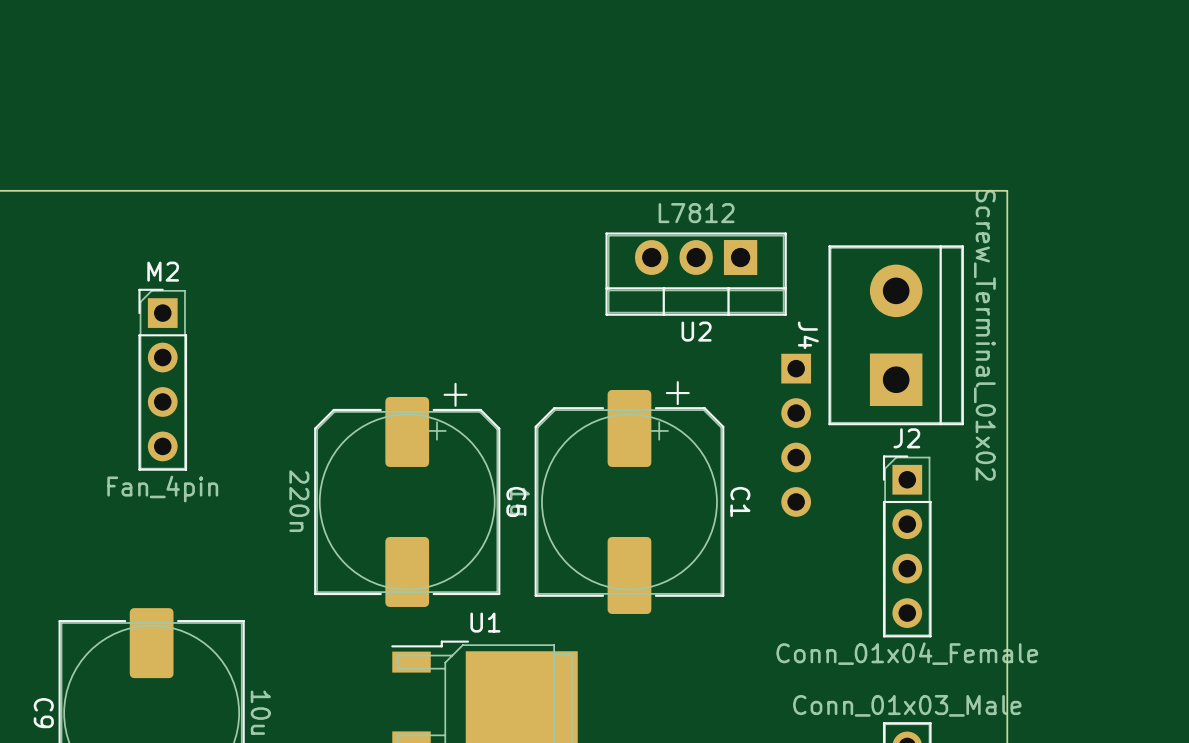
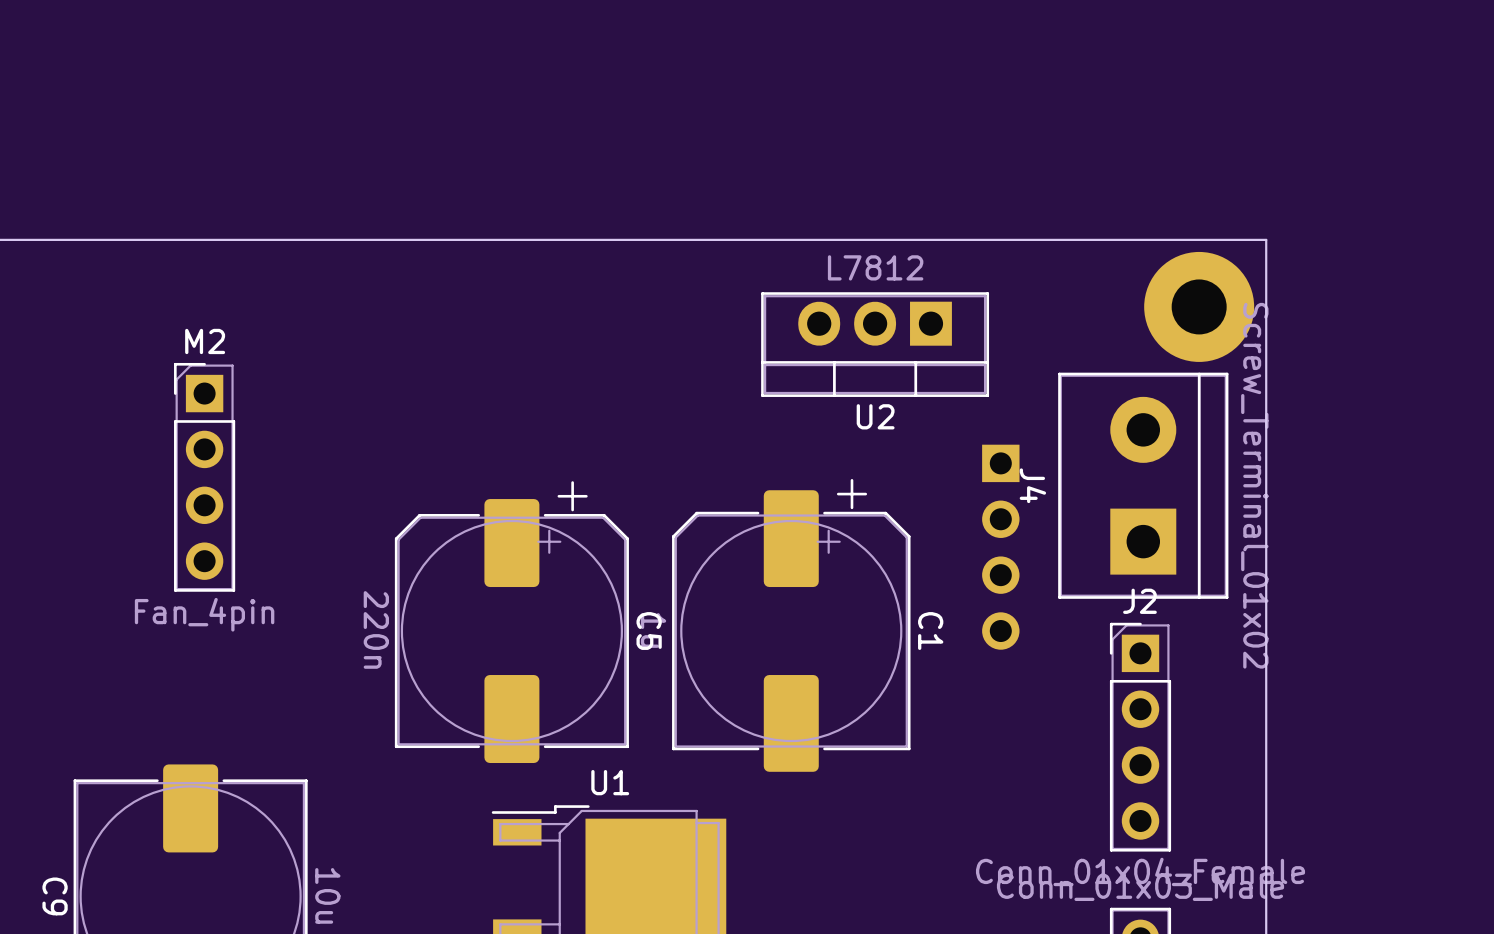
part: none -> (1199, 306)
J4 position: (896, 335) -> (1143, 485)
J2 position: (907, 546) -> (1140, 737)

